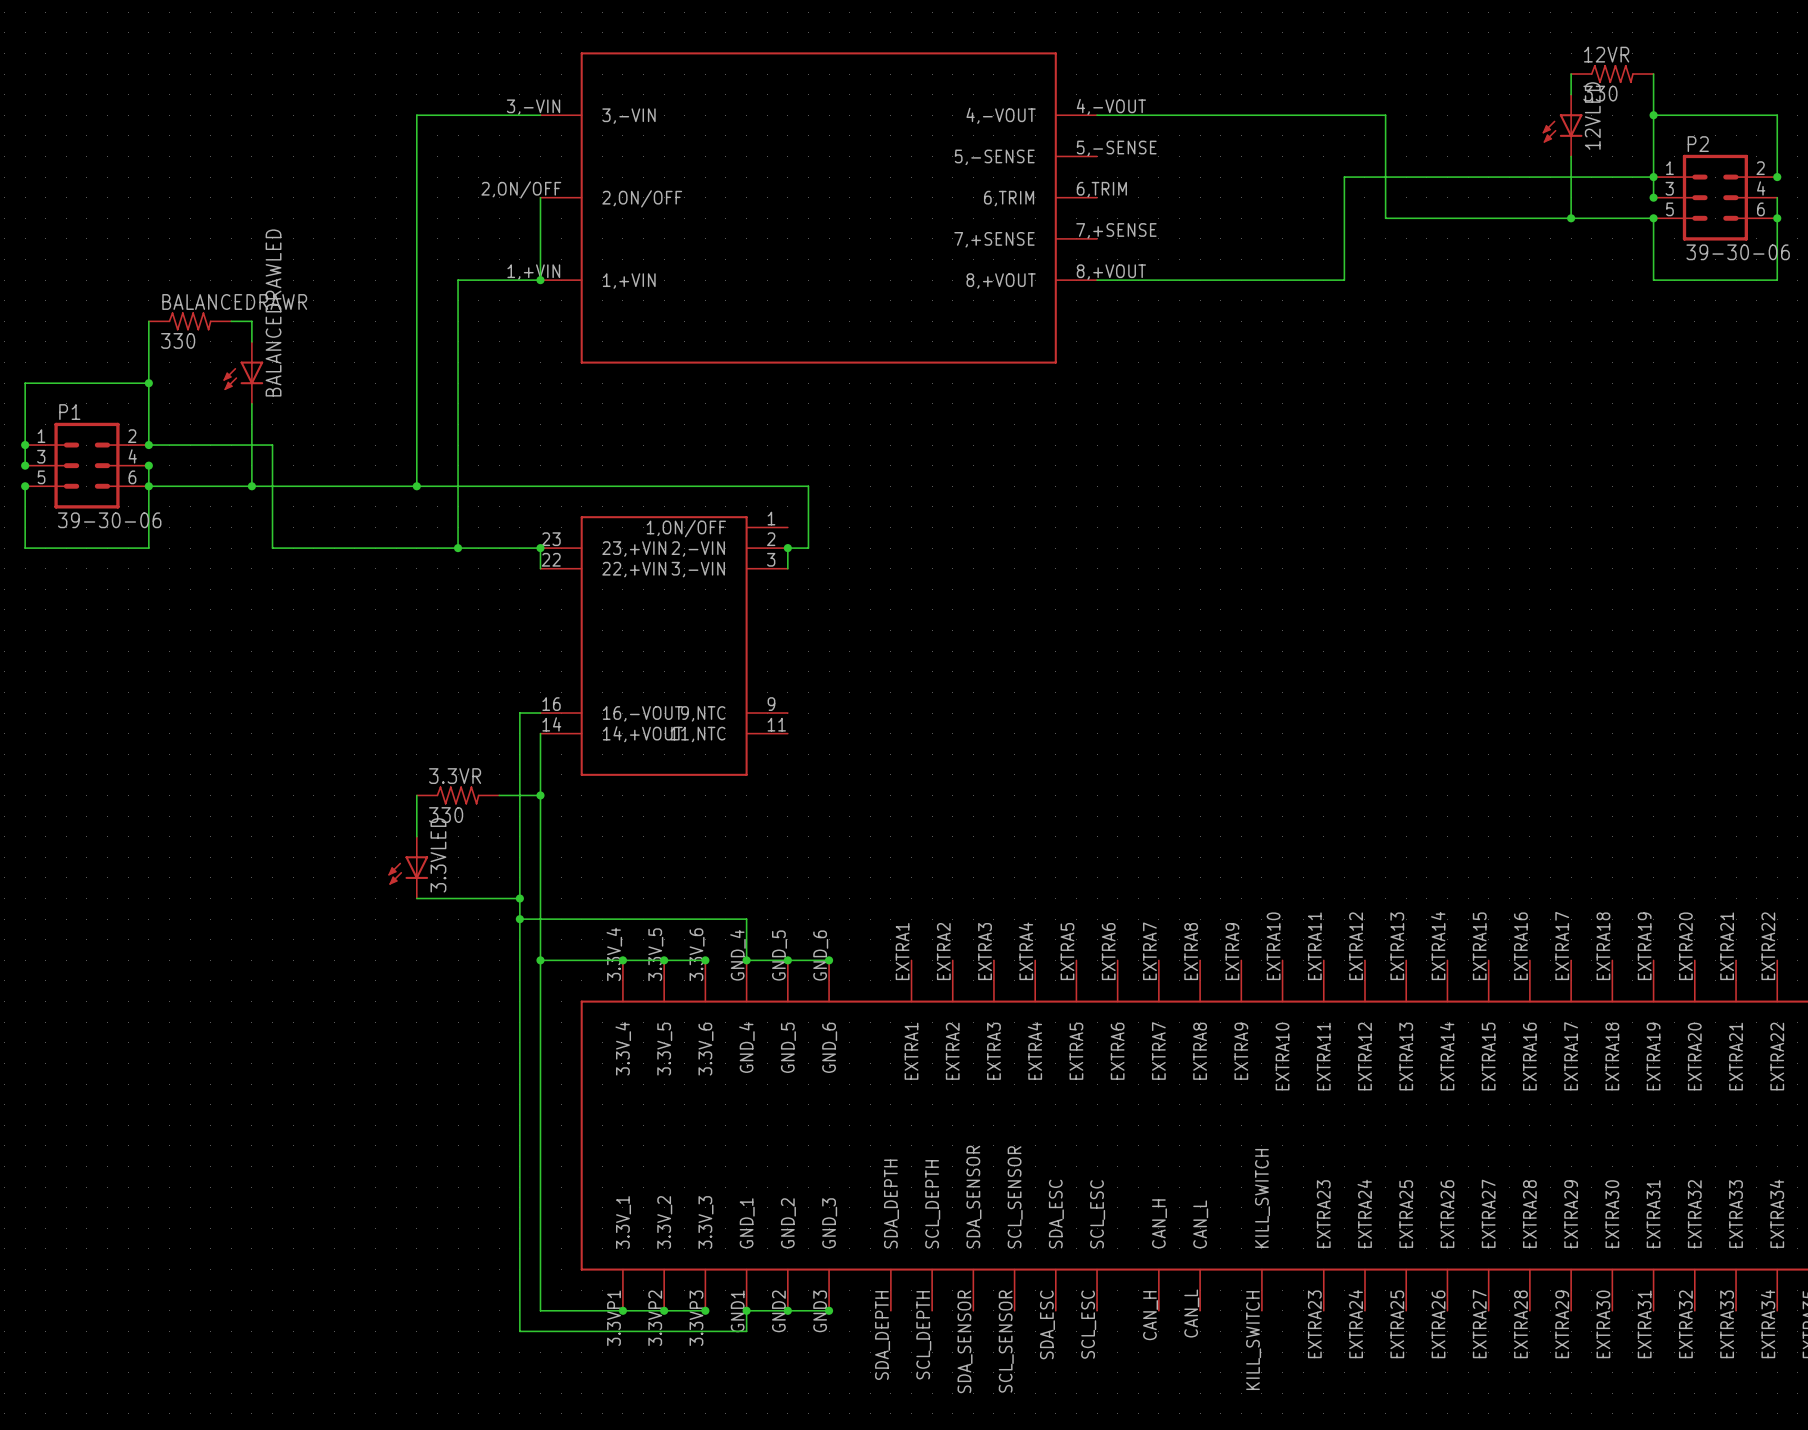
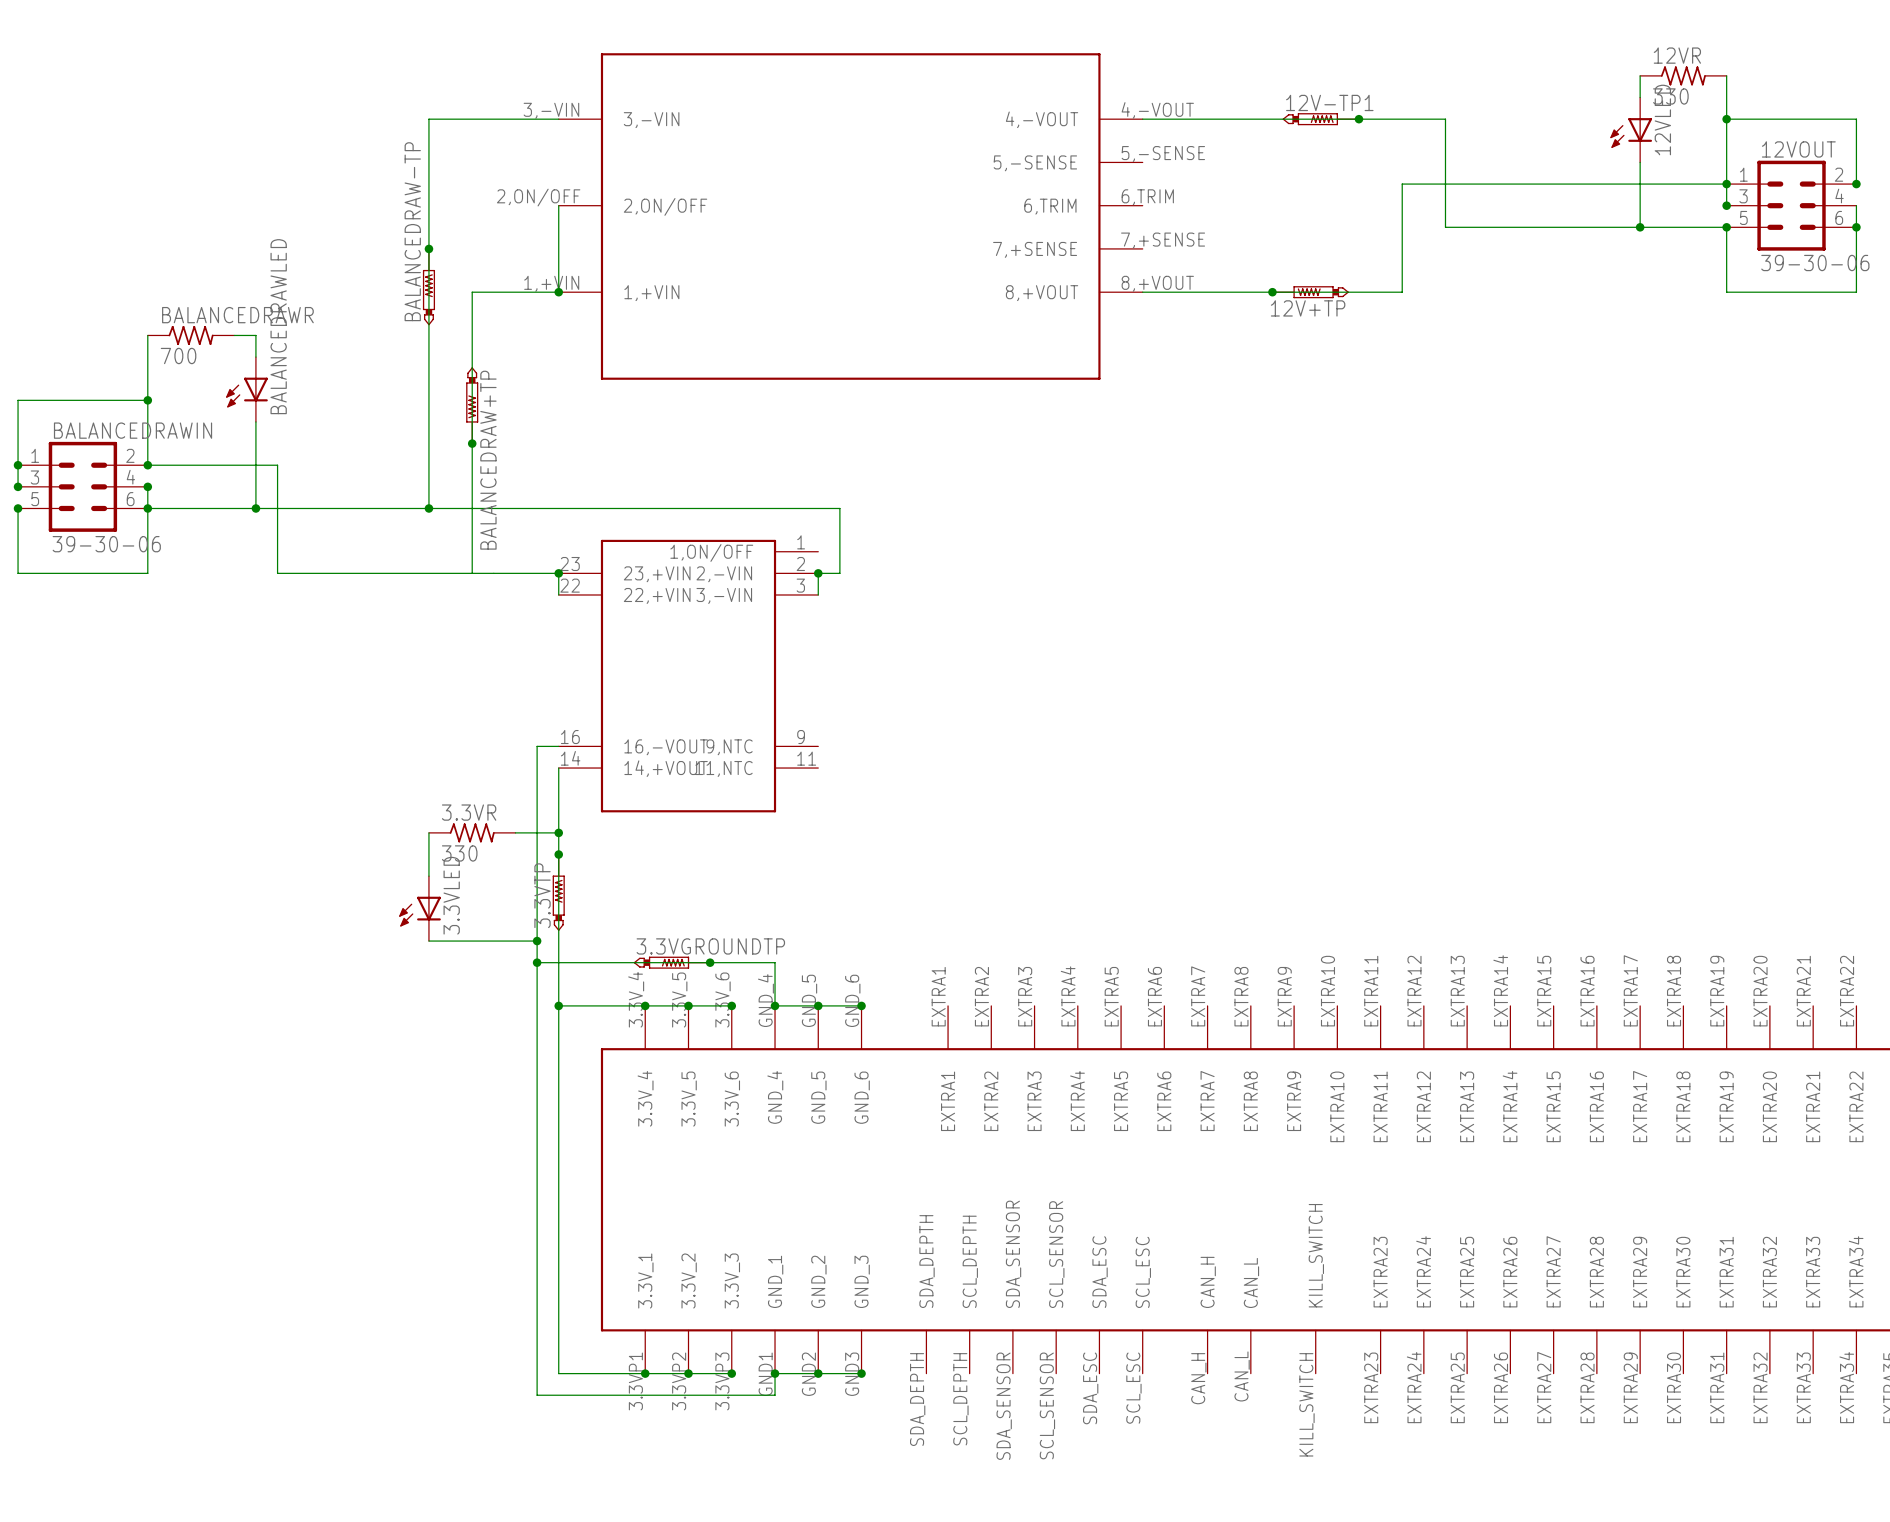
12V-TP1: none -> (1320, 119)
junction: none -> (1358, 119)
P2 name: P2 (1698, 144) -> 12VOUT (1798, 149)
junction: none -> (428, 248)
BALANCEDRAW-TP: none -> (428, 287)
junction: none -> (1272, 292)
12V+TP: none -> (1310, 292)
BALANCEDRAWR value: 330 (178, 340) -> 700 (178, 356)
BALANCEDRAW+TP: none -> (472, 405)
P1 name: P1 (69, 412) -> BALANCEDRAWIN (133, 430)
junction: none -> (472, 443)
junction: (458, 548) -> none
junction: none -> (558, 854)
3.3VTP: none -> (558, 892)
3.3VGROUNDTP: none -> (671, 962)
junction: none -> (710, 962)

